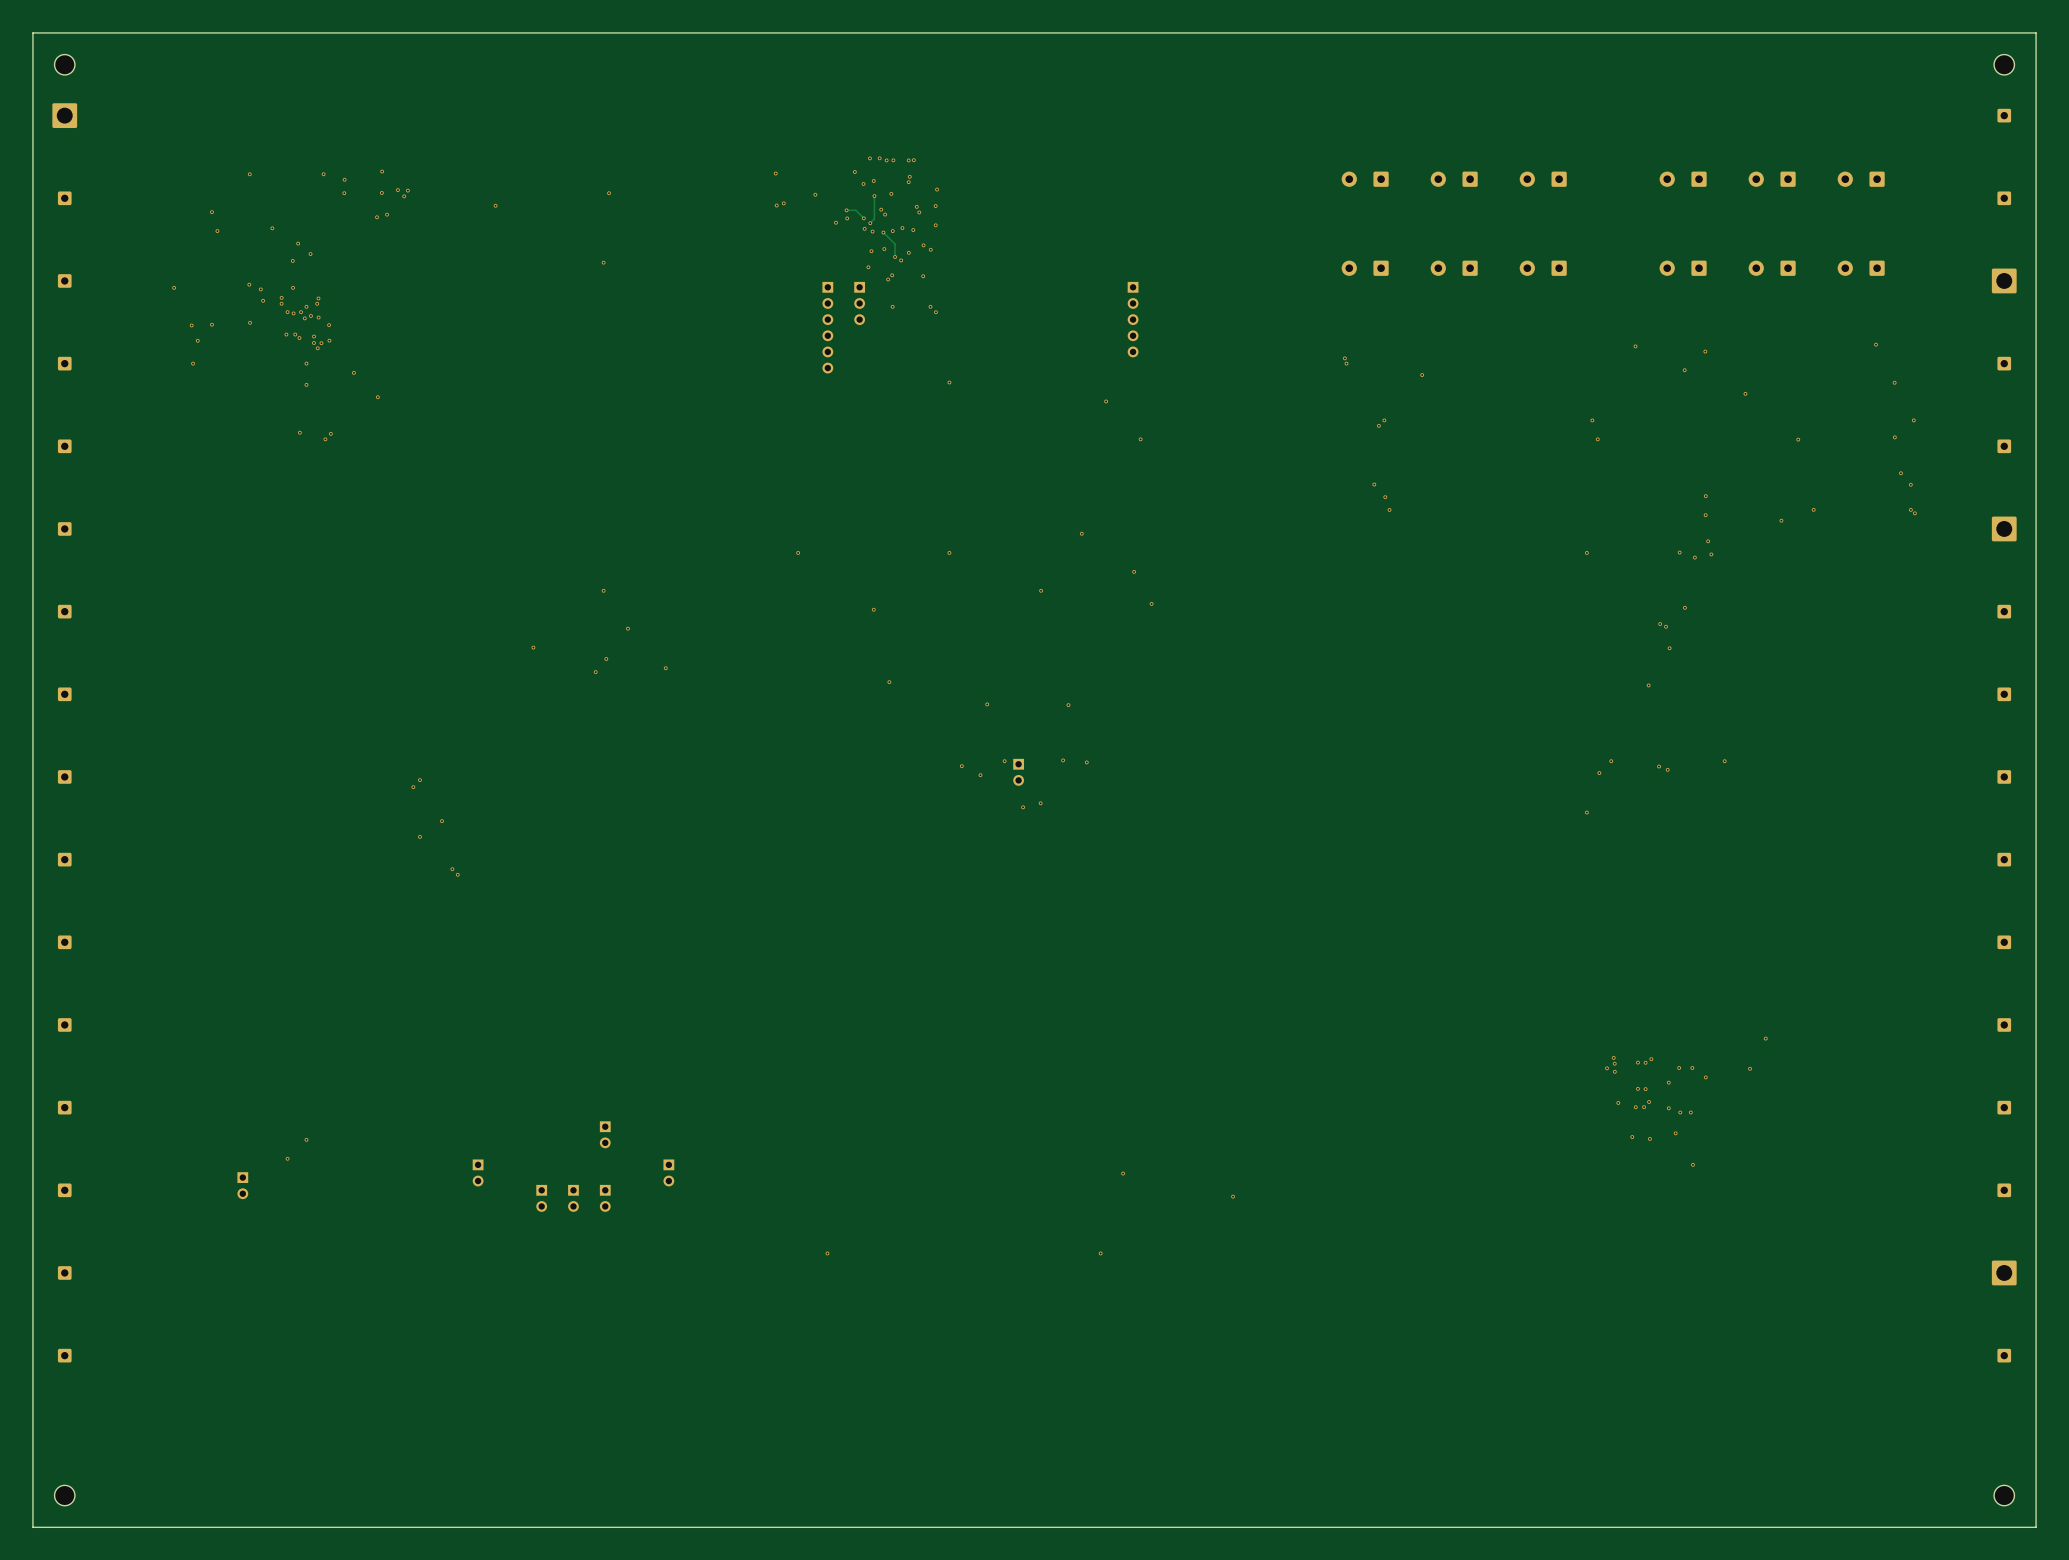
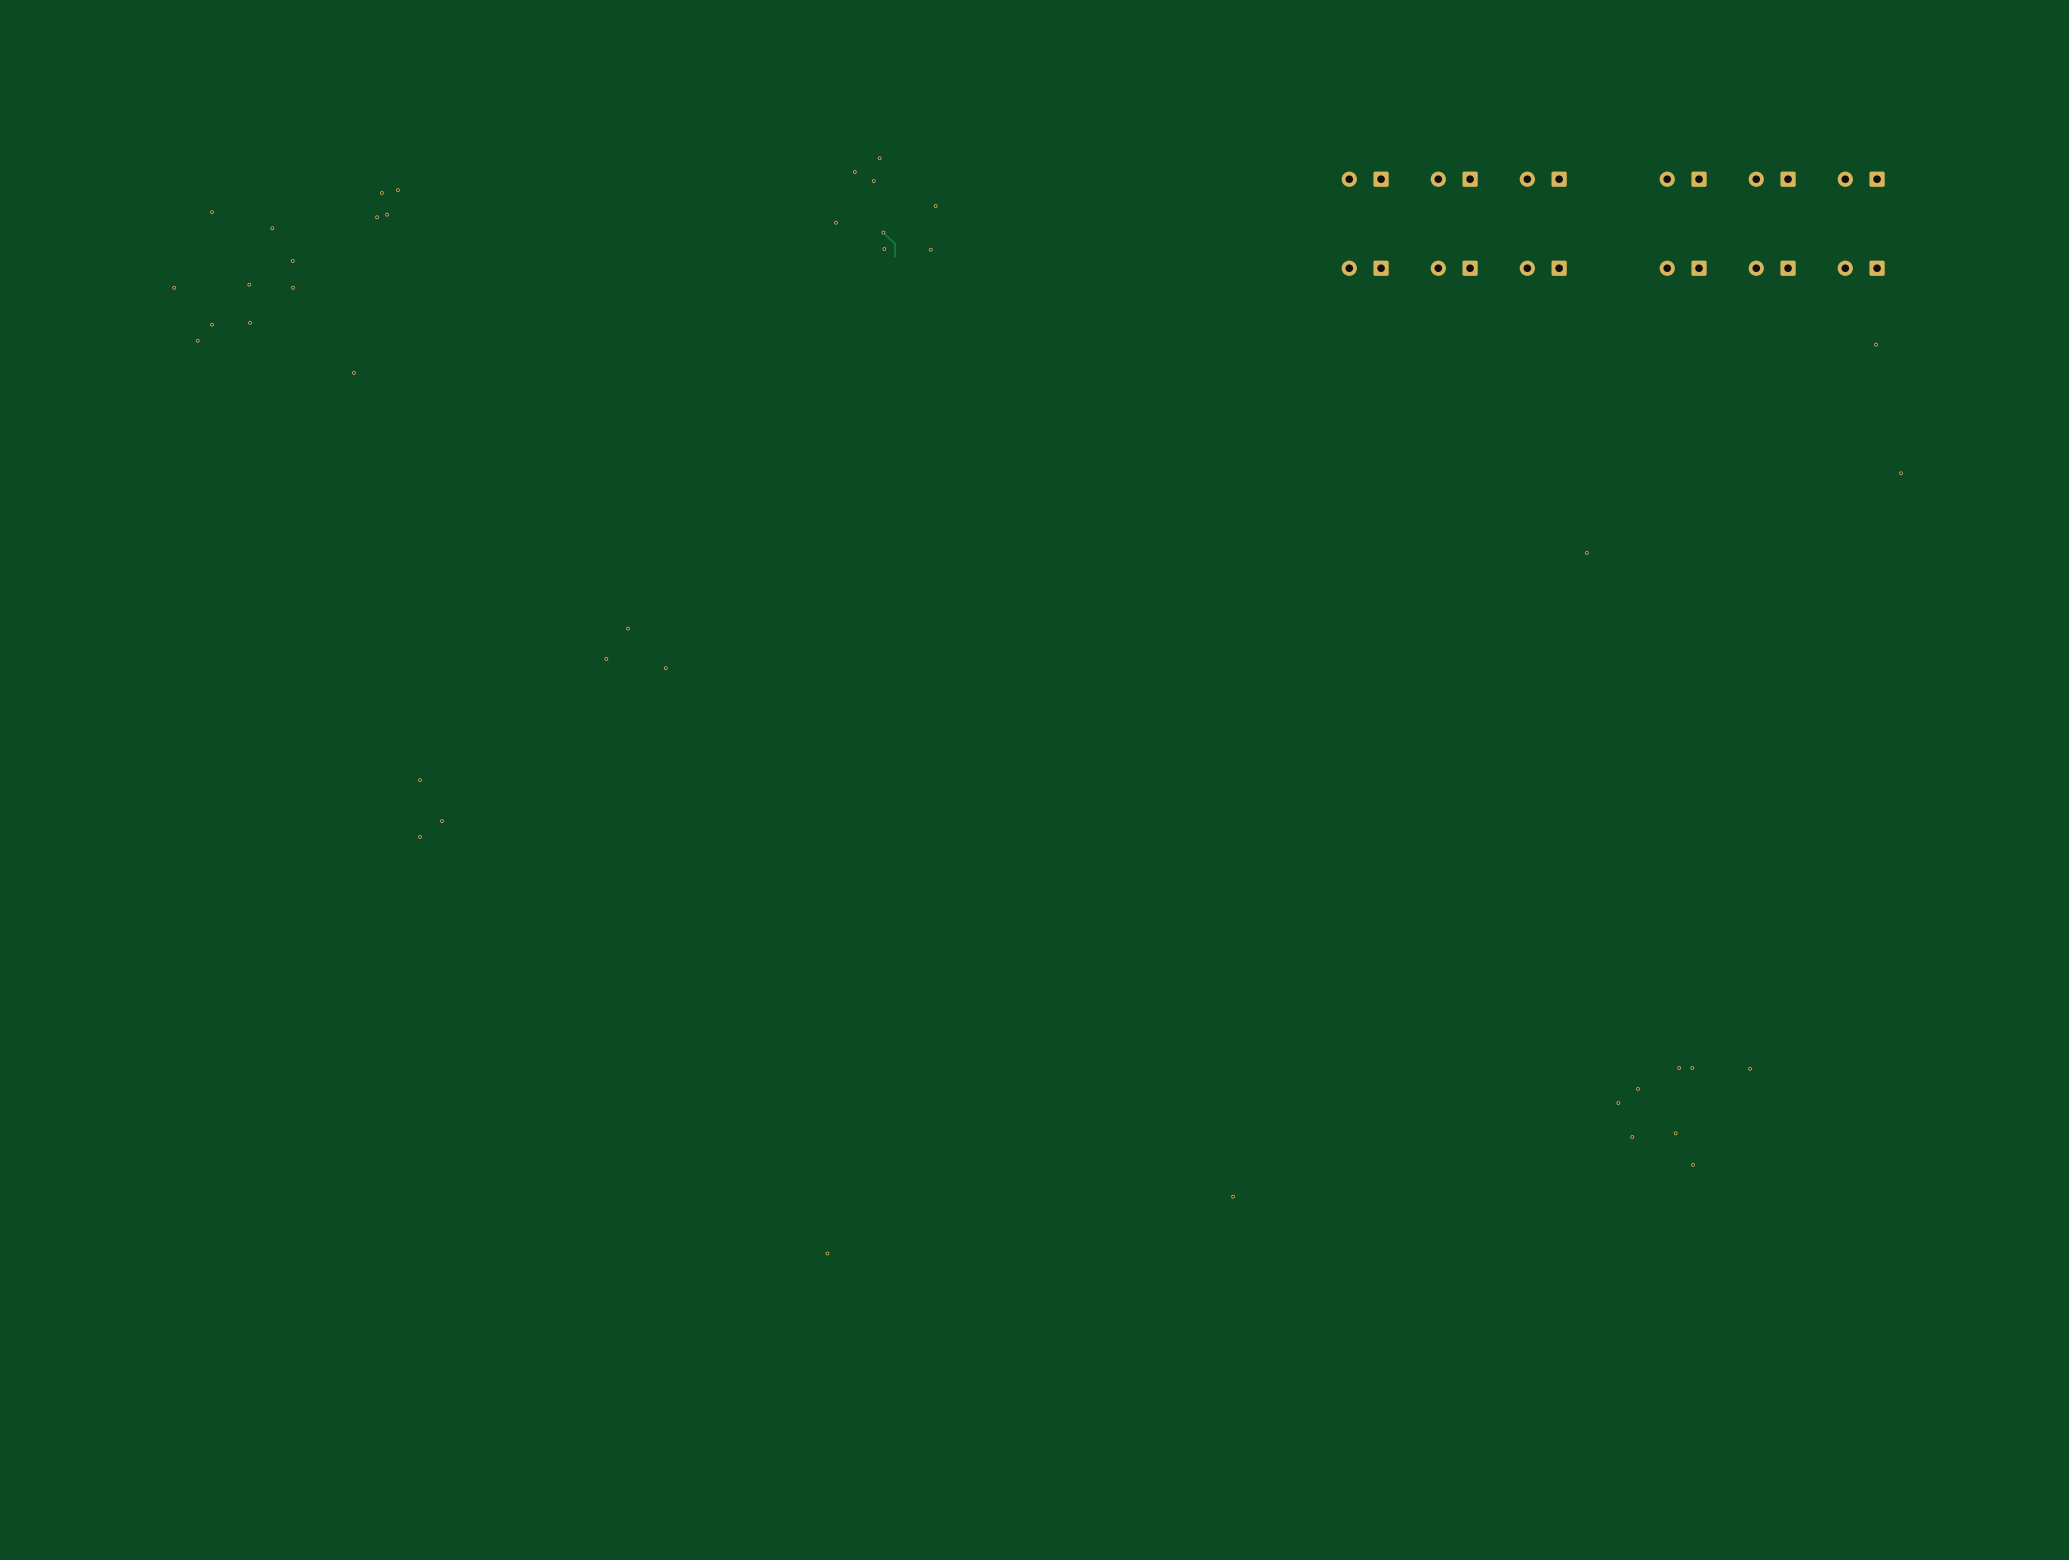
board edge: (2036, 32) (32, 32) (32, 1527) (2036, 1527) (2036, 32) -> none
part: (64, 64) -> none
part: (2004, 64) -> none
part: (64, 115) -> none
part: (2004, 115) -> none
via: (869, 158) -> none
via: (886, 160) -> none
via: (893, 160) -> none
via: (908, 160) -> none
via: (913, 160) -> none
via: (382, 171) -> none
via: (775, 173) -> none
via: (249, 174) -> none
via: (323, 174) -> none
via: (909, 176) -> none
via: (344, 179) -> none
via: (908, 182) -> none
via: (863, 183) -> none
via: (937, 189) -> none
via: (407, 190) -> none
via: (344, 193) -> none
via: (609, 193) -> none
via: (891, 193) -> none
via: (815, 194) -> none
via: (404, 196) -> none
track: (874, 196) (874, 219) (870, 223) -> none
via: (874, 196) -> none
part: (64, 198) -> none
part: (2004, 198) -> none
via: (783, 203) -> none
via: (495, 205) -> none
via: (776, 205) -> none
via: (916, 206) -> none
via: (881, 209) -> none
track: (846, 210) (855, 210) (863, 218) -> none
via: (846, 210) -> none
via: (919, 212) -> none
via: (885, 214) -> none
via: (847, 218) -> none
via: (863, 218) -> none
via: (870, 223) -> none
via: (935, 225) -> none
via: (864, 228) -> none
via: (902, 228) -> none
via: (913, 230) -> none
via: (217, 231) -> none
via: (872, 231) -> none
via: (892, 231) -> none
via: (298, 243) -> none
via: (923, 245) -> none
via: (871, 251) -> none
via: (908, 252) -> none
via: (310, 254) -> none
via: (895, 257) -> none
via: (901, 260) -> none
via: (603, 262) -> none
via: (868, 267) -> none
via: (892, 275) -> none
via: (923, 276) -> none
via: (888, 279) -> none
part: (64, 280) -> none
part: (2004, 280) -> none
via: (260, 289) -> none
via: (281, 297) -> none
via: (318, 298) -> none
via: (263, 300) -> none
via: (281, 303) -> none
via: (317, 303) -> none
part: (859, 303) -> none
via: (306, 306) -> none
via: (892, 306) -> none
via: (930, 306) -> none
via: (287, 312) -> none
via: (301, 312) -> none
via: (935, 312) -> none
via: (293, 313) -> none
via: (310, 315) -> none
via: (318, 317) -> none
via: (304, 318) -> none
part: (1133, 319) -> none
via: (191, 325) -> none
via: (329, 325) -> none
part: (827, 327) -> none
via: (286, 334) -> none
via: (295, 334) -> none
via: (314, 336) -> none
via: (299, 338) -> none
via: (329, 340) -> none
via: (313, 342) -> none
via: (321, 343) -> none
via: (1635, 346) -> none
via: (317, 348) -> none
via: (1705, 351) -> none
via: (1344, 358) -> none
part: (64, 363) -> none
via: (193, 363) -> none
via: (306, 363) -> none
via: (1346, 363) -> none
part: (2004, 363) -> none
via: (1684, 370) -> none
via: (1422, 375) -> none
via: (949, 382) -> none
via: (1894, 382) -> none
via: (306, 384) -> none
via: (1745, 393) -> none
via: (377, 397) -> none
via: (1106, 401) -> none
via: (1384, 420) -> none
via: (1592, 420) -> none
via: (1913, 420) -> none
via: (1378, 425) -> none
via: (299, 432) -> none
via: (330, 433) -> none
via: (1894, 437) -> none
via: (325, 439) -> none
via: (1140, 439) -> none
via: (1597, 439) -> none
via: (1798, 439) -> none
part: (64, 446) -> none
part: (2004, 446) -> none
via: (1374, 484) -> none
via: (1910, 484) -> none
via: (1705, 496) -> none
via: (1385, 497) -> none
via: (1389, 509) -> none
via: (1813, 509) -> none
via: (1910, 509) -> none
via: (1914, 513) -> none
via: (1705, 515) -> none
via: (1781, 520) -> none
part: (64, 528) -> none
part: (2004, 528) -> none
via: (1081, 533) -> none
via: (1708, 541) -> none
via: (798, 552) -> none
via: (949, 552) -> none
via: (1679, 552) -> none
via: (1711, 554) -> none
via: (1694, 557) -> none
via: (1134, 571) -> none
via: (603, 590) -> none
via: (1041, 590) -> none
via: (1151, 603) -> none
via: (1684, 607) -> none
via: (873, 609) -> none
part: (64, 611) -> none
part: (2004, 611) -> none
via: (1660, 624) -> none
via: (1666, 626) -> none
via: (533, 647) -> none
via: (1669, 648) -> none
via: (595, 672) -> none
via: (889, 682) -> none
via: (1648, 685) -> none
part: (64, 694) -> none
part: (2004, 694) -> none
via: (987, 704) -> none
via: (1068, 705) -> none
via: (1063, 760) -> none
via: (1004, 761) -> none
via: (1611, 761) -> none
via: (1724, 761) -> none
via: (1086, 762) -> none
via: (961, 766) -> none
via: (1659, 766) -> none
via: (1667, 769) -> none
part: (1018, 772) -> none
via: (1599, 773) -> none
via: (980, 775) -> none
part: (64, 776) -> none
part: (2004, 776) -> none
via: (413, 787) -> none
via: (1040, 803) -> none
via: (1023, 807) -> none
via: (1586, 812) -> none
part: (64, 859) -> none
part: (2004, 859) -> none
via: (452, 869) -> none
via: (457, 874) -> none
part: (64, 942) -> none
part: (2004, 942) -> none
part: (64, 1024) -> none
part: (2004, 1024) -> none
via: (1765, 1038) -> none
via: (1613, 1057) -> none
via: (1651, 1059) -> none
via: (1637, 1062) -> none
via: (1645, 1062) -> none
via: (1614, 1063) -> none
via: (1606, 1068) -> none
via: (1614, 1071) -> none
via: (1705, 1077) -> none
via: (1668, 1082) -> none
via: (1645, 1089) -> none
via: (1649, 1101) -> none
part: (64, 1107) -> none
via: (1635, 1107) -> none
via: (1644, 1107) -> none
part: (2004, 1107) -> none
via: (1668, 1108) -> none
via: (1680, 1112) -> none
via: (1690, 1112) -> none
part: (605, 1134) -> none
via: (1649, 1138) -> none
via: (306, 1139) -> none
via: (287, 1158) -> none
part: (478, 1172) -> none
part: (668, 1172) -> none
via: (1123, 1173) -> none
part: (242, 1185) -> none
part: (64, 1190) -> none
part: (2004, 1190) -> none
part: (541, 1198) -> none
part: (573, 1198) -> none
part: (605, 1198) -> none
via: (1100, 1253) -> none
part: (64, 1272) -> none
part: (2004, 1272) -> none
part: (64, 1355) -> none
part: (2004, 1355) -> none
part: (64, 1495) -> none
part: (2004, 1495) -> none

